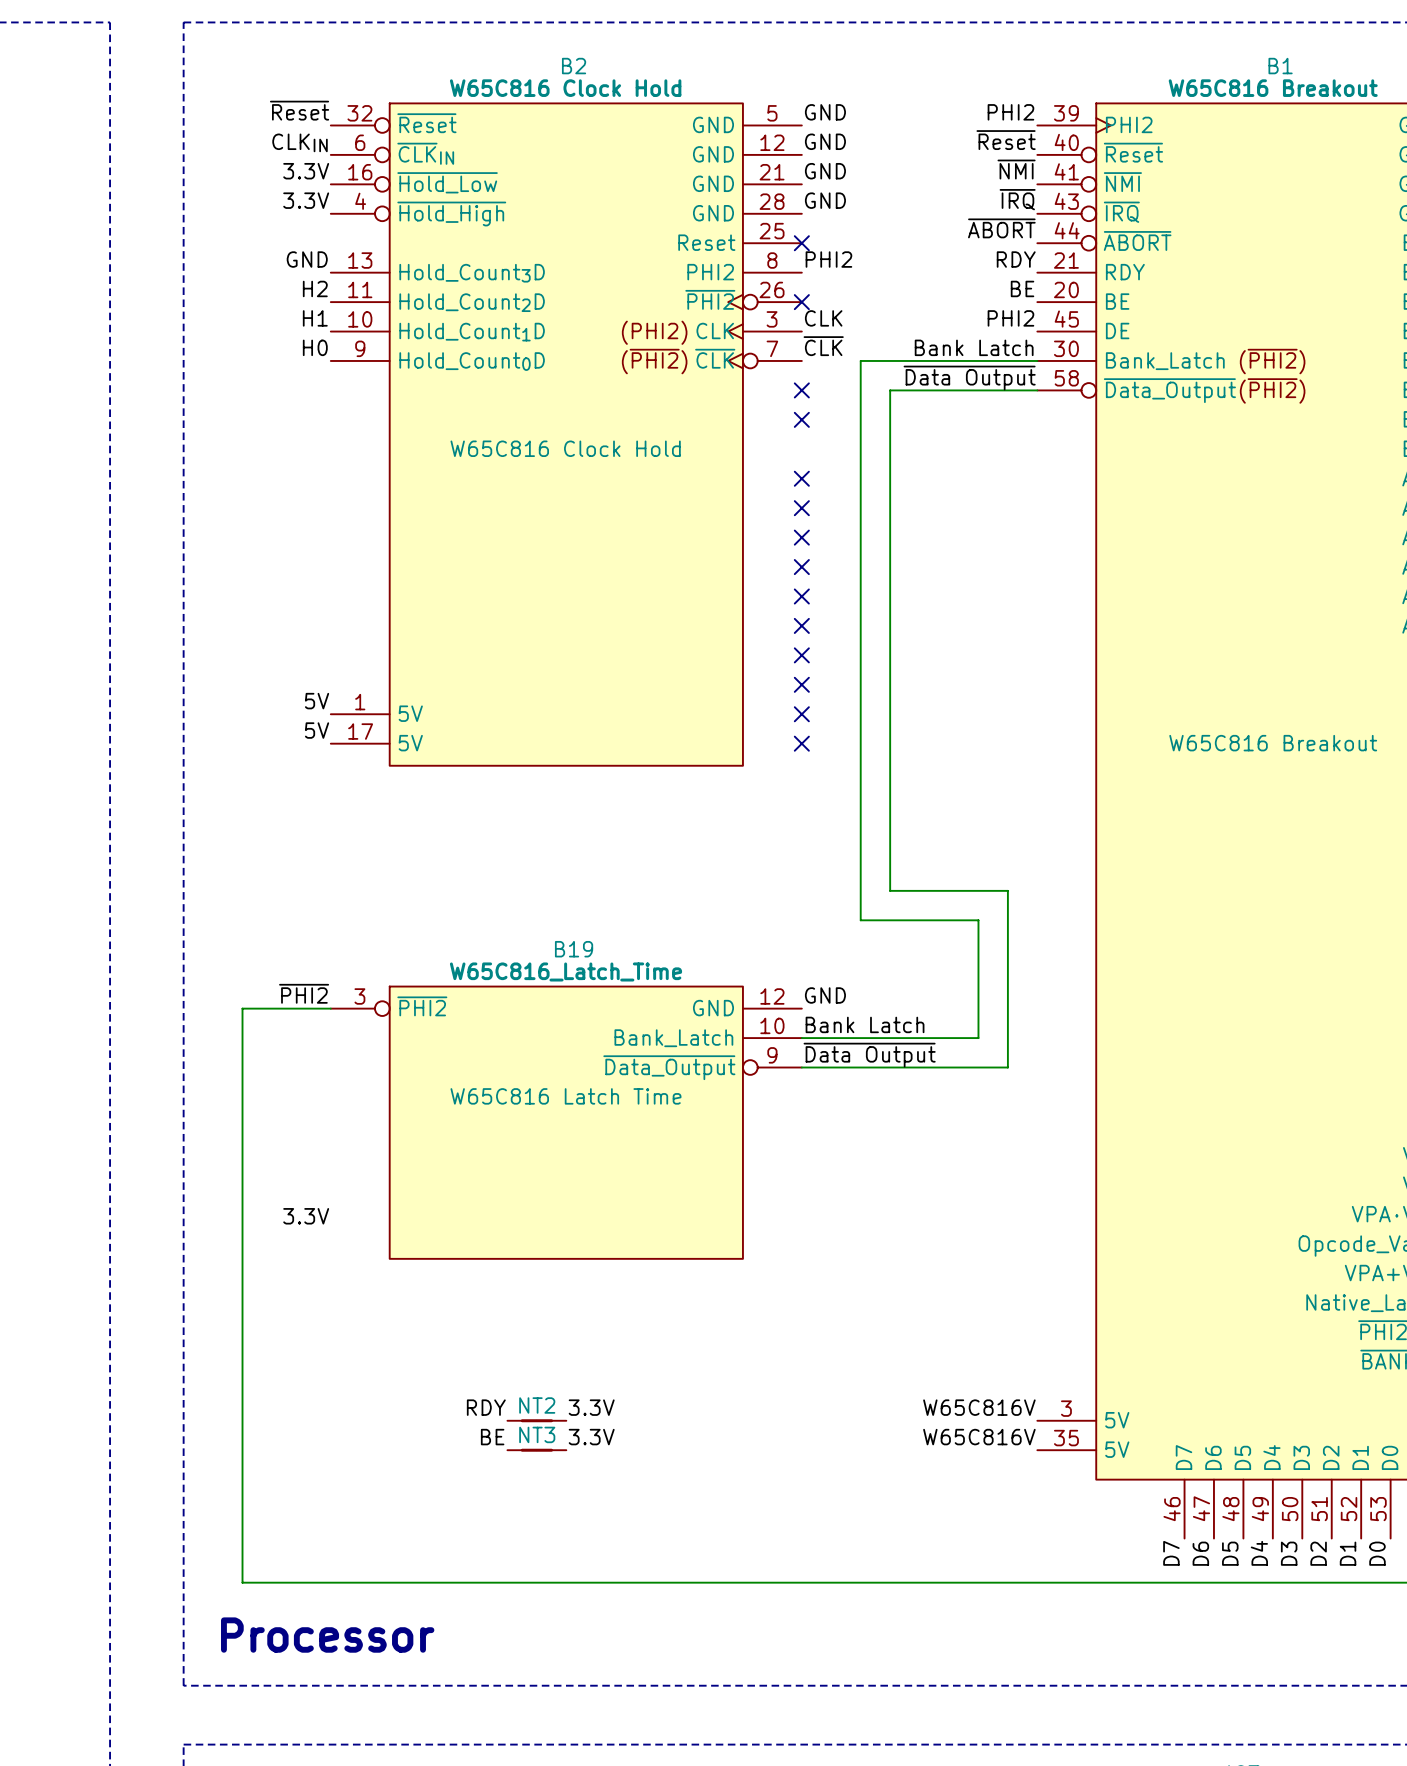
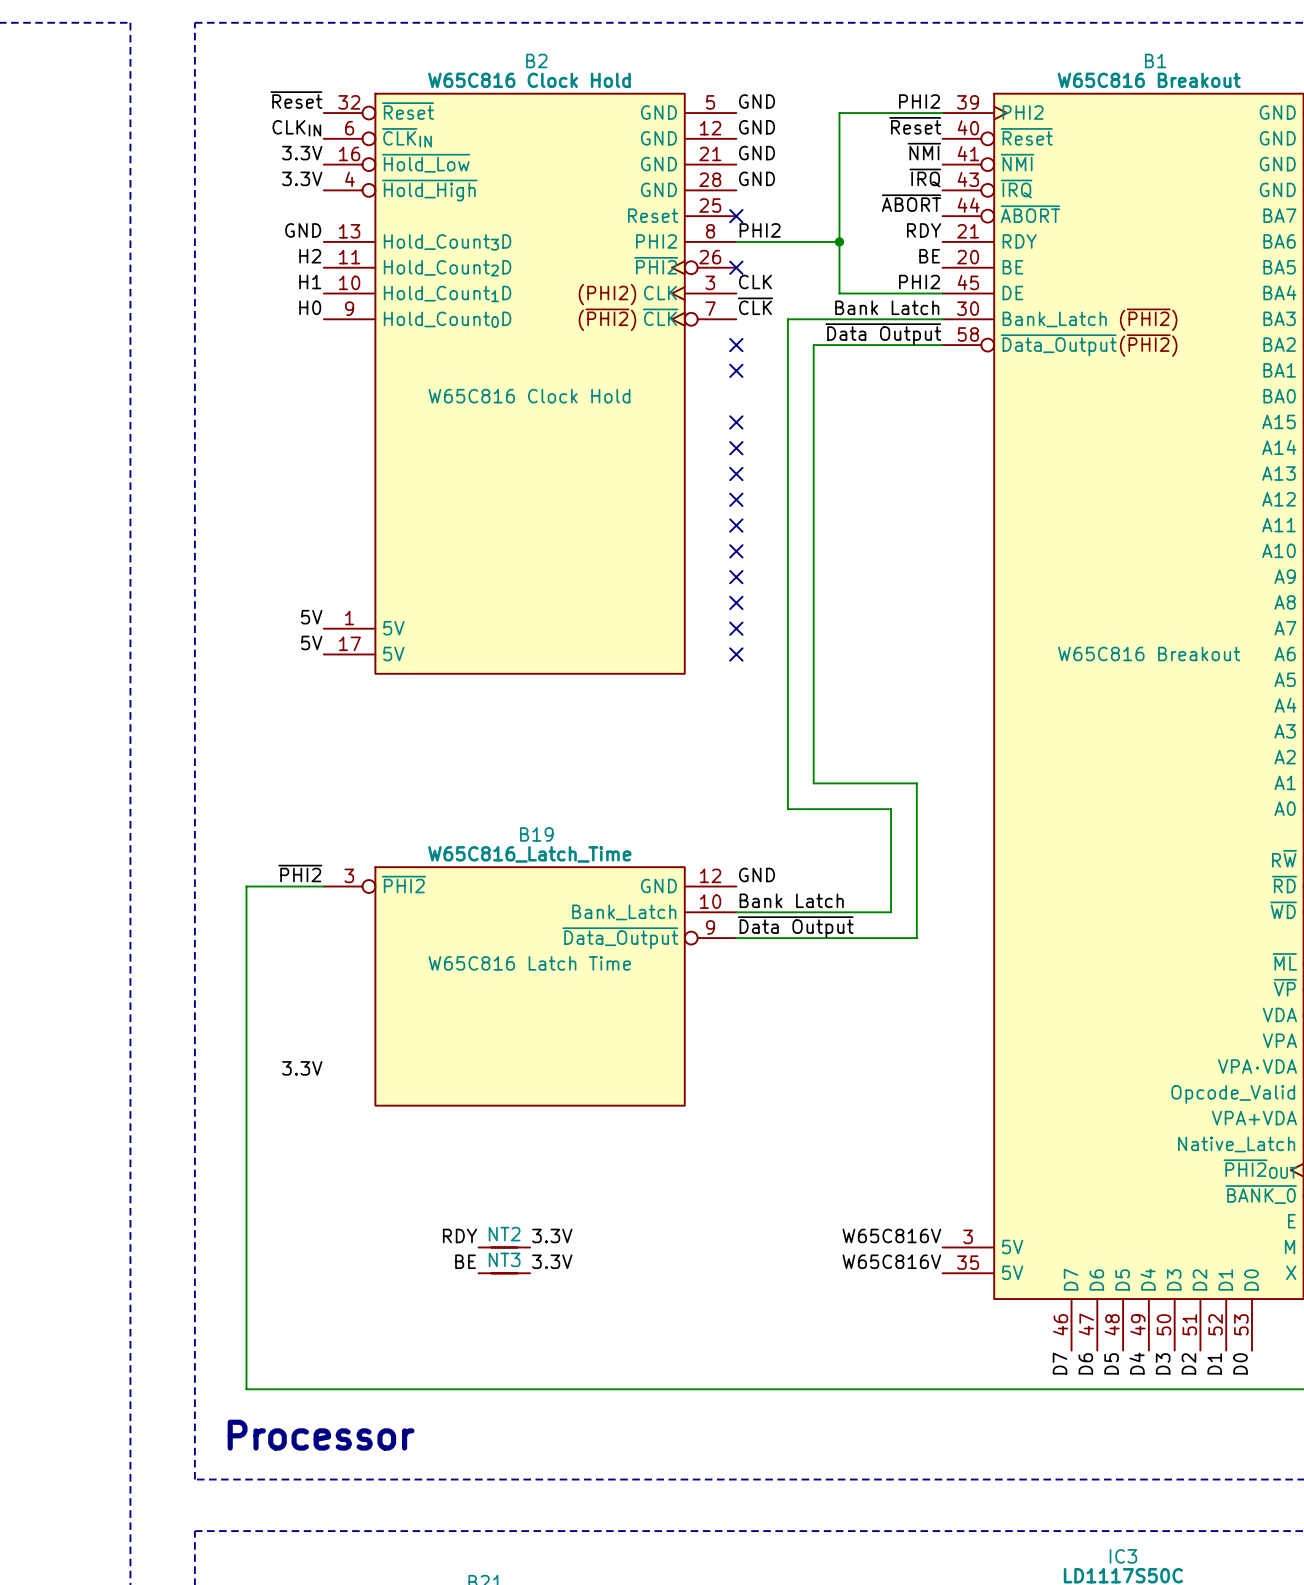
wire: none -> (942, 113) (839, 113) (839, 293) (942, 293)
wire: none -> (736, 241) (839, 241)
junction: none -> (839, 241)

